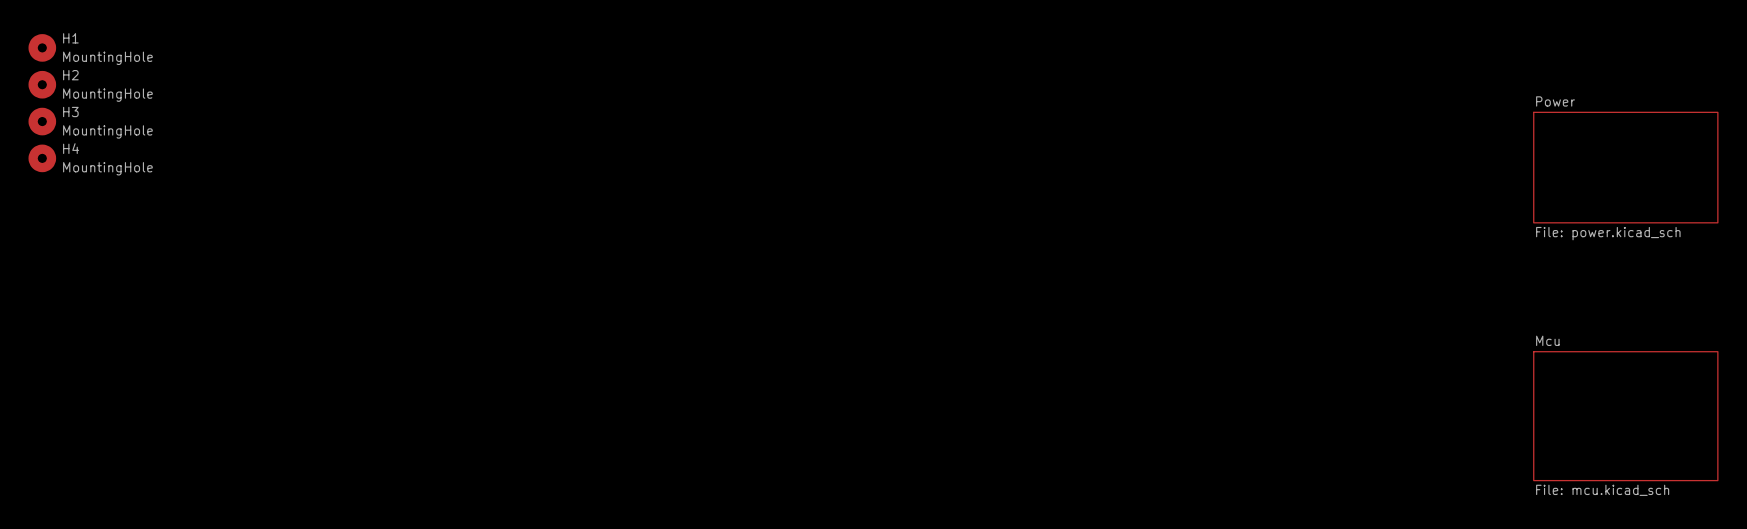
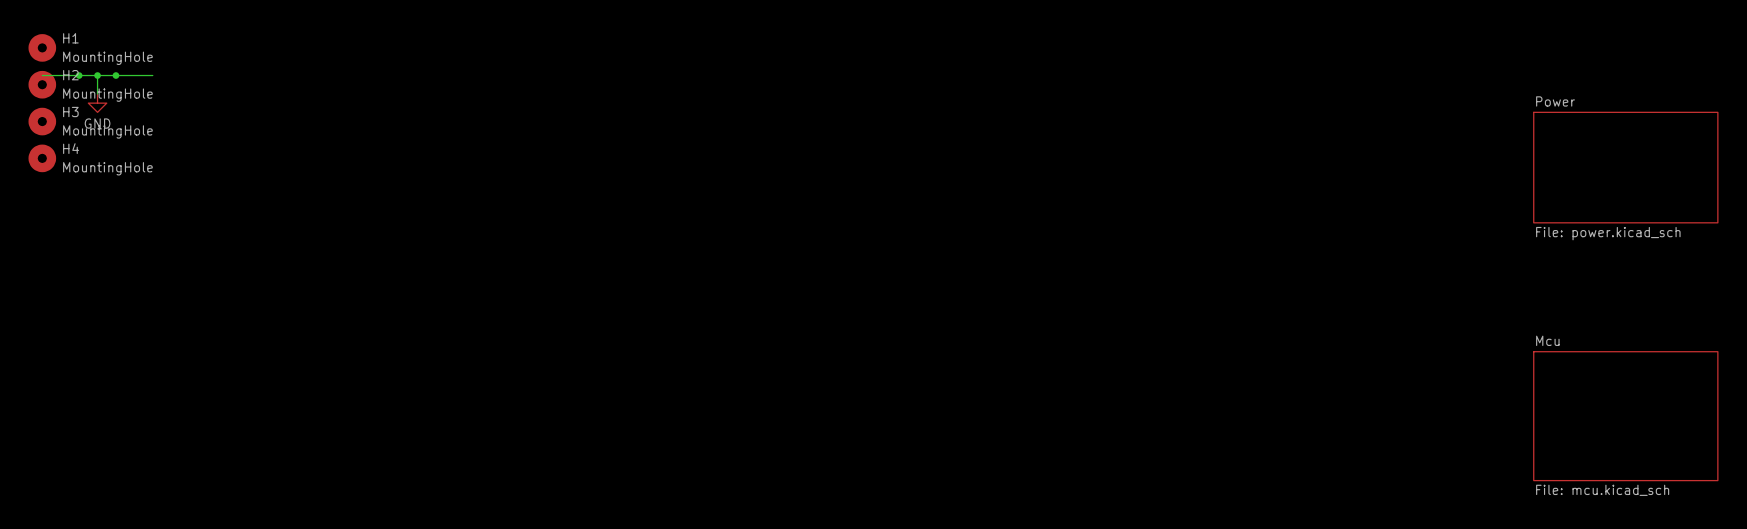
wire: none -> (42, 75) (152, 75)
junction: none -> (79, 75)
wire: none -> (97, 75) (97, 93)
junction: none -> (97, 75)
junction: none -> (115, 75)
power symbol: none -> GND (97, 103)

